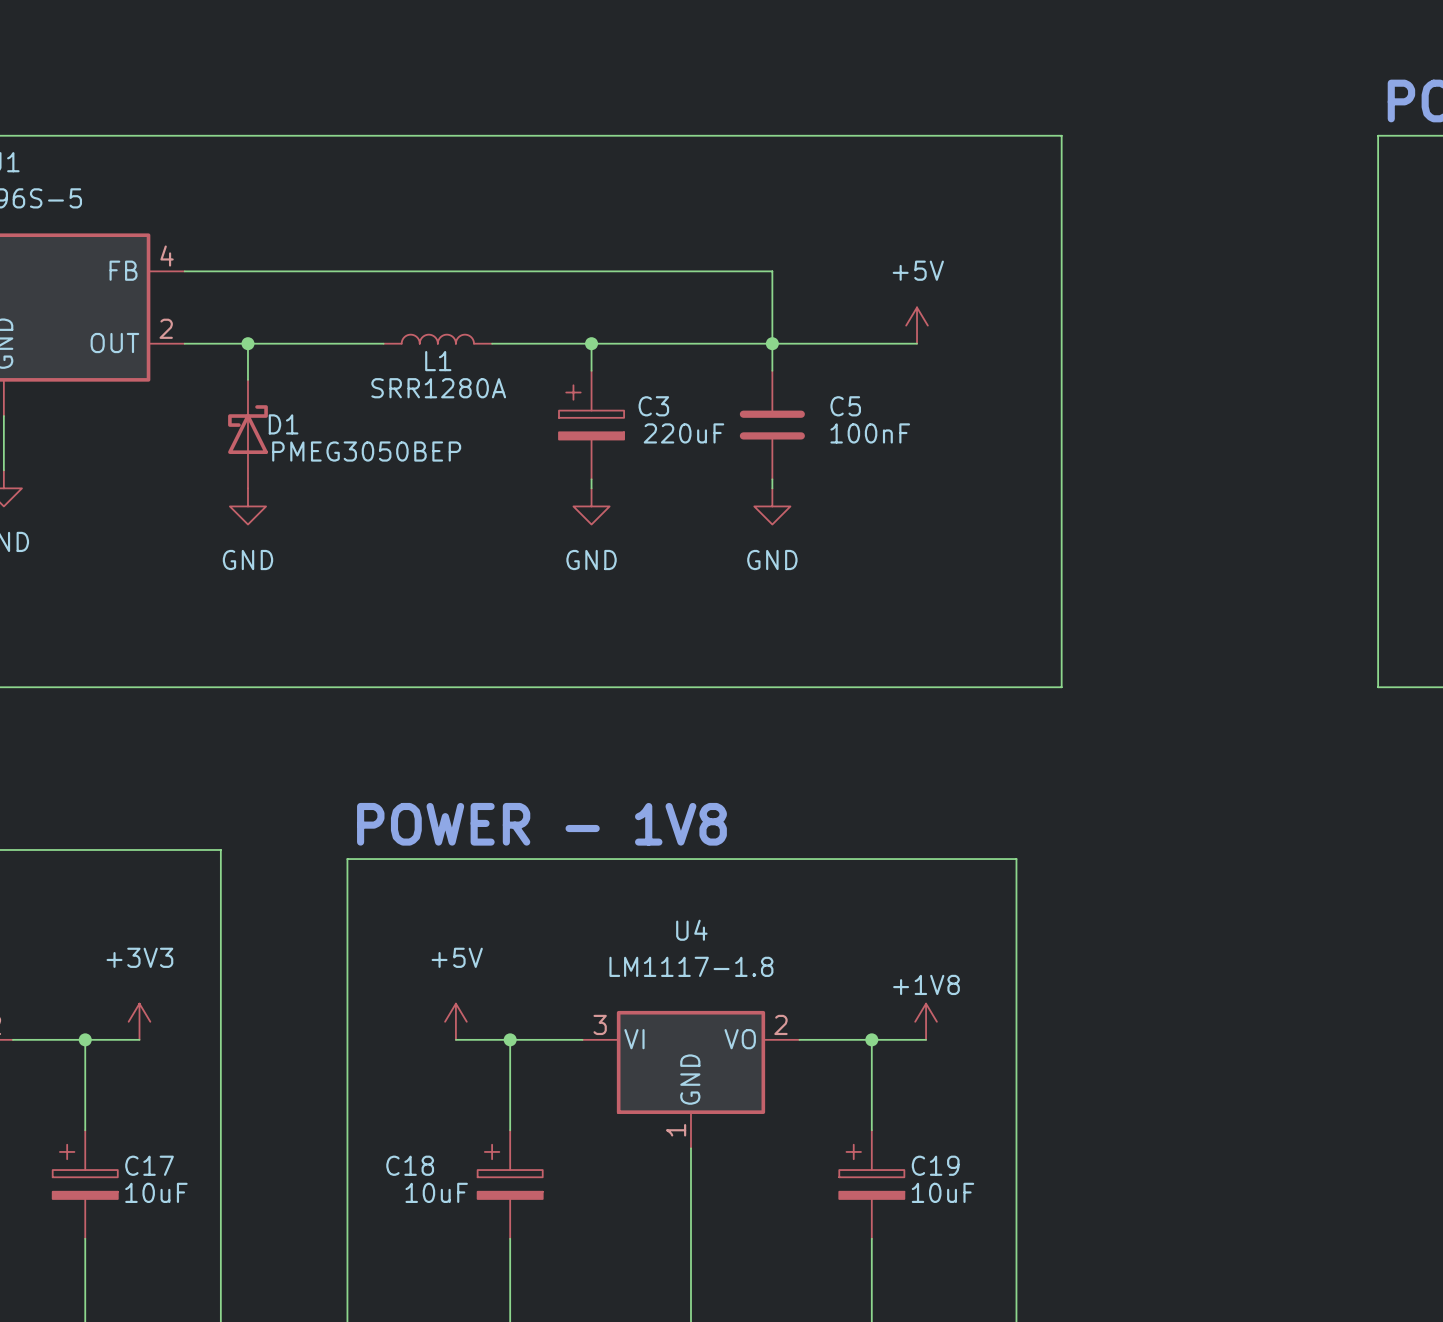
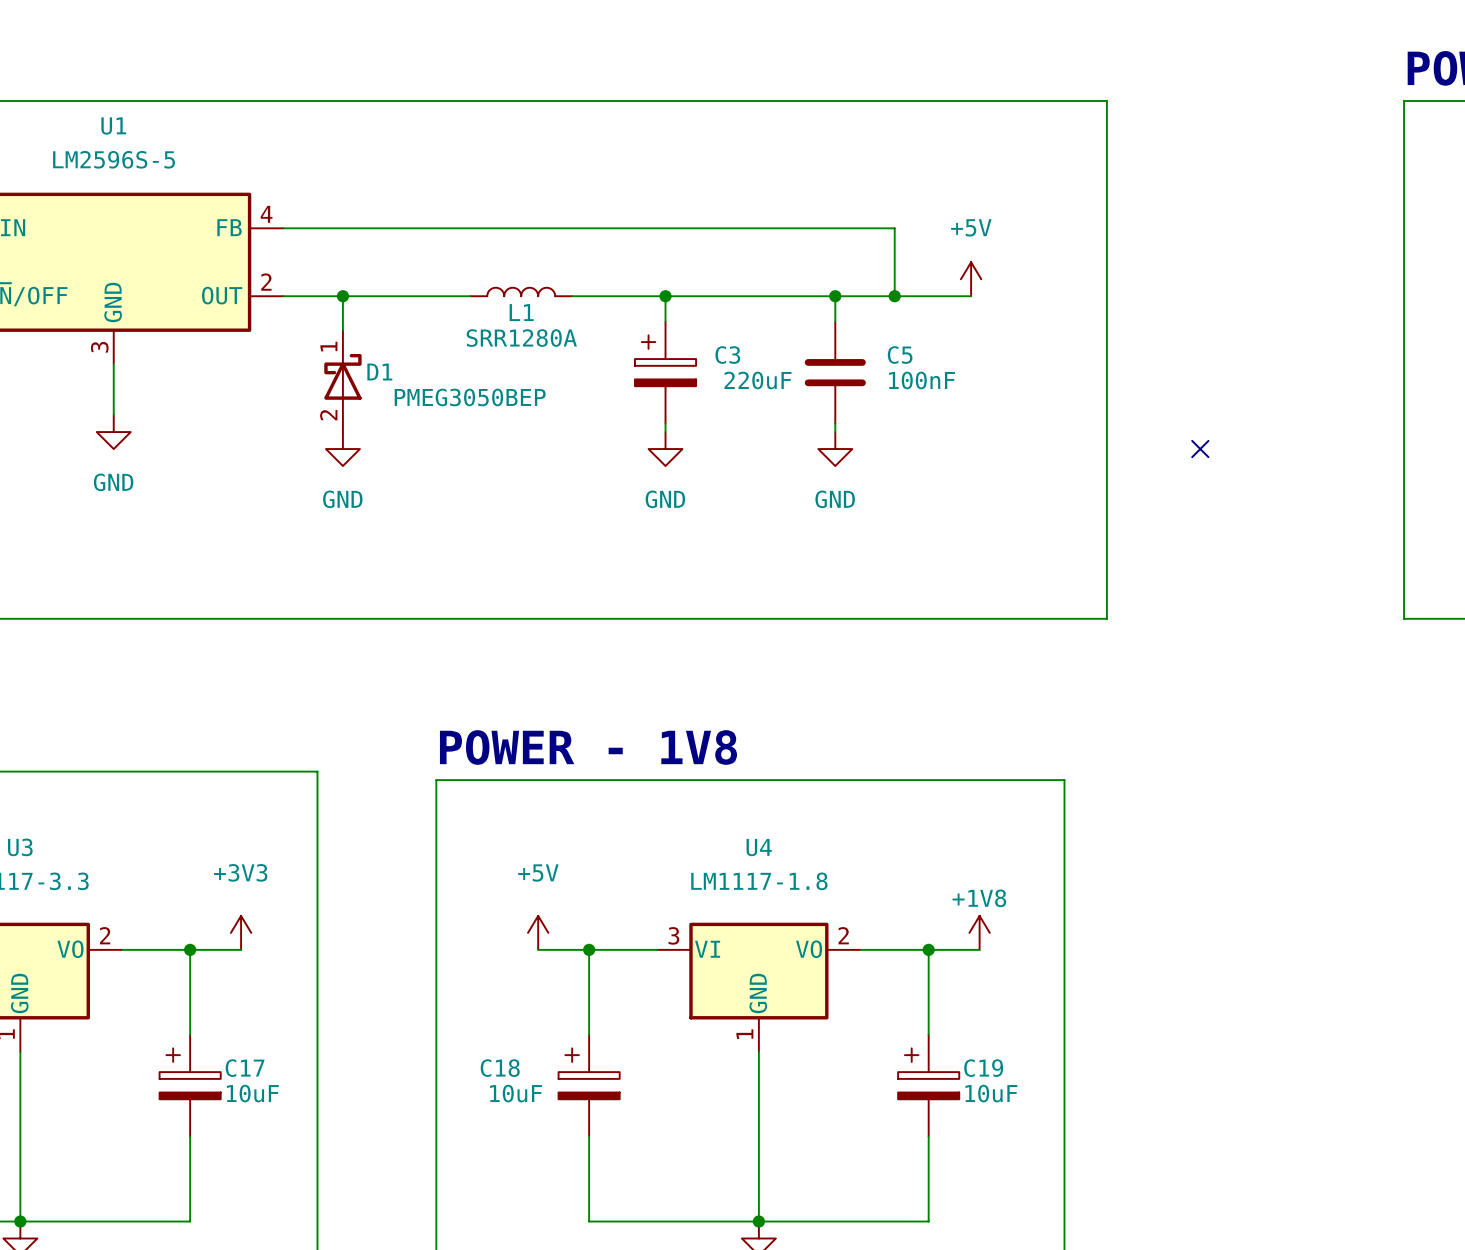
wire: (772, 271) (772, 343) -> (835, 228) (894, 228) (894, 296)
junction: none -> (894, 296)
D1 pin number: none -> 1 (328, 346)
D1 pin number: none -> 2 (328, 415)
no-connect mark: none -> (1200, 449)

